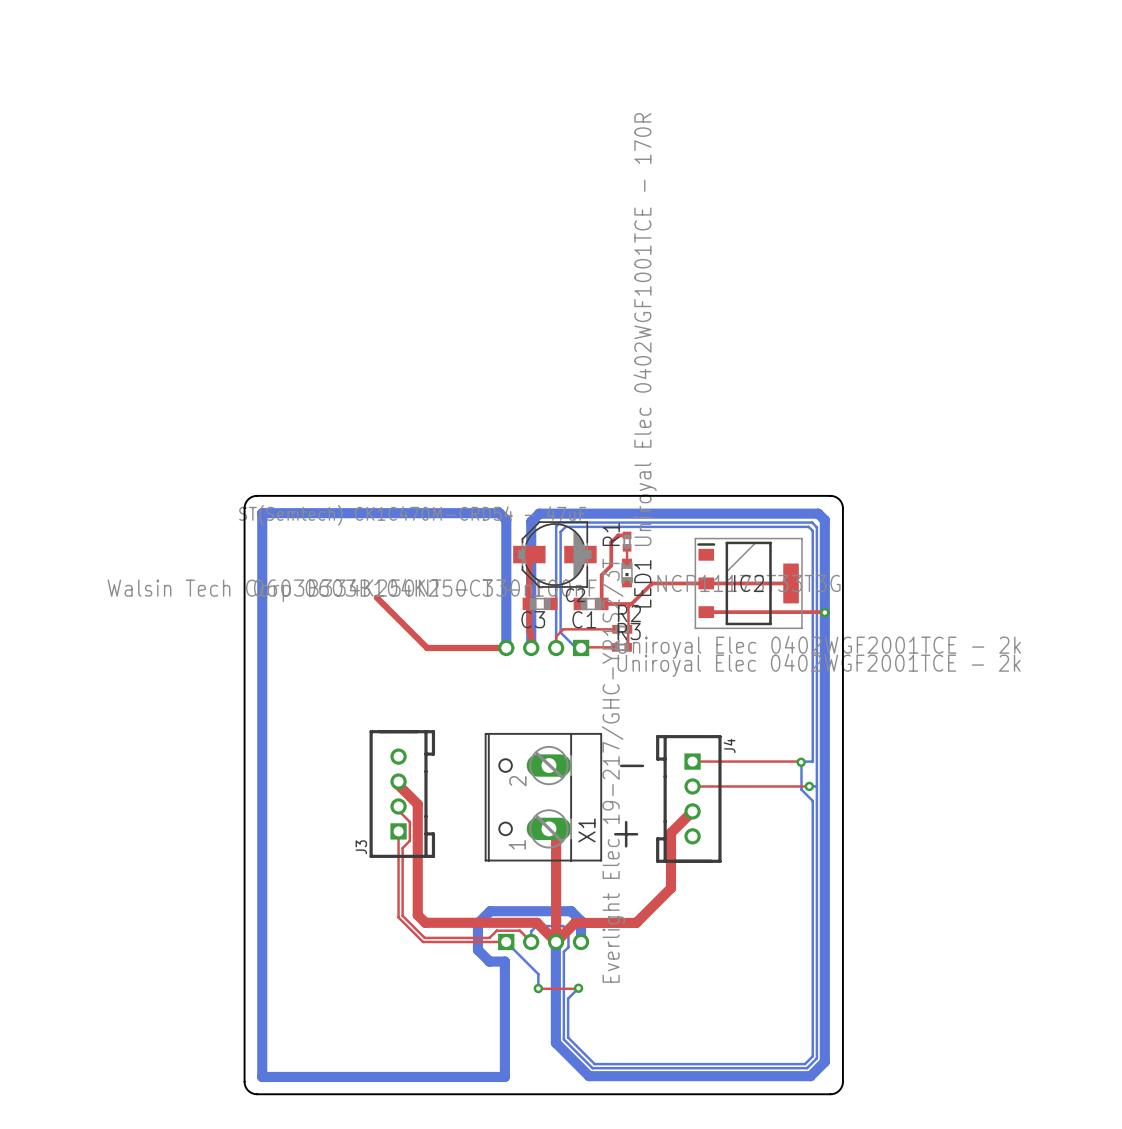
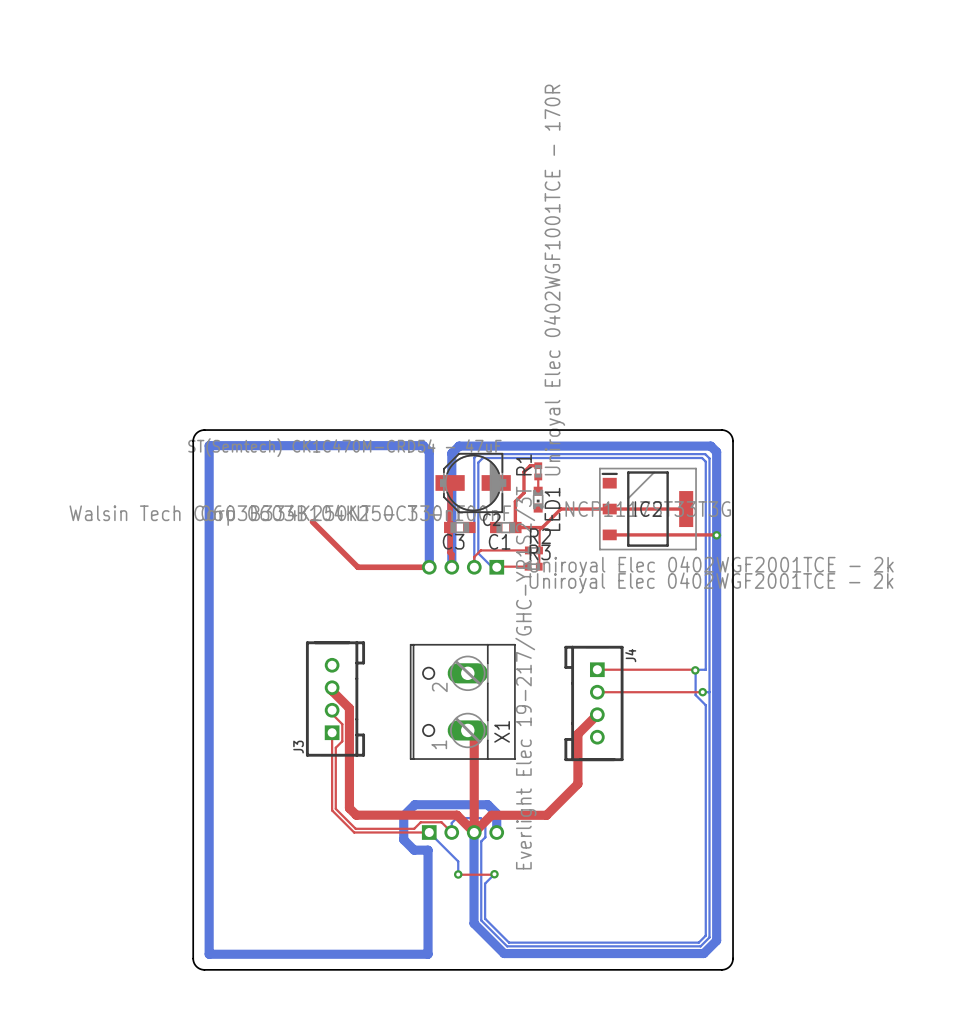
text: - (632, 765) -> none
text: + (626, 834) -> none

